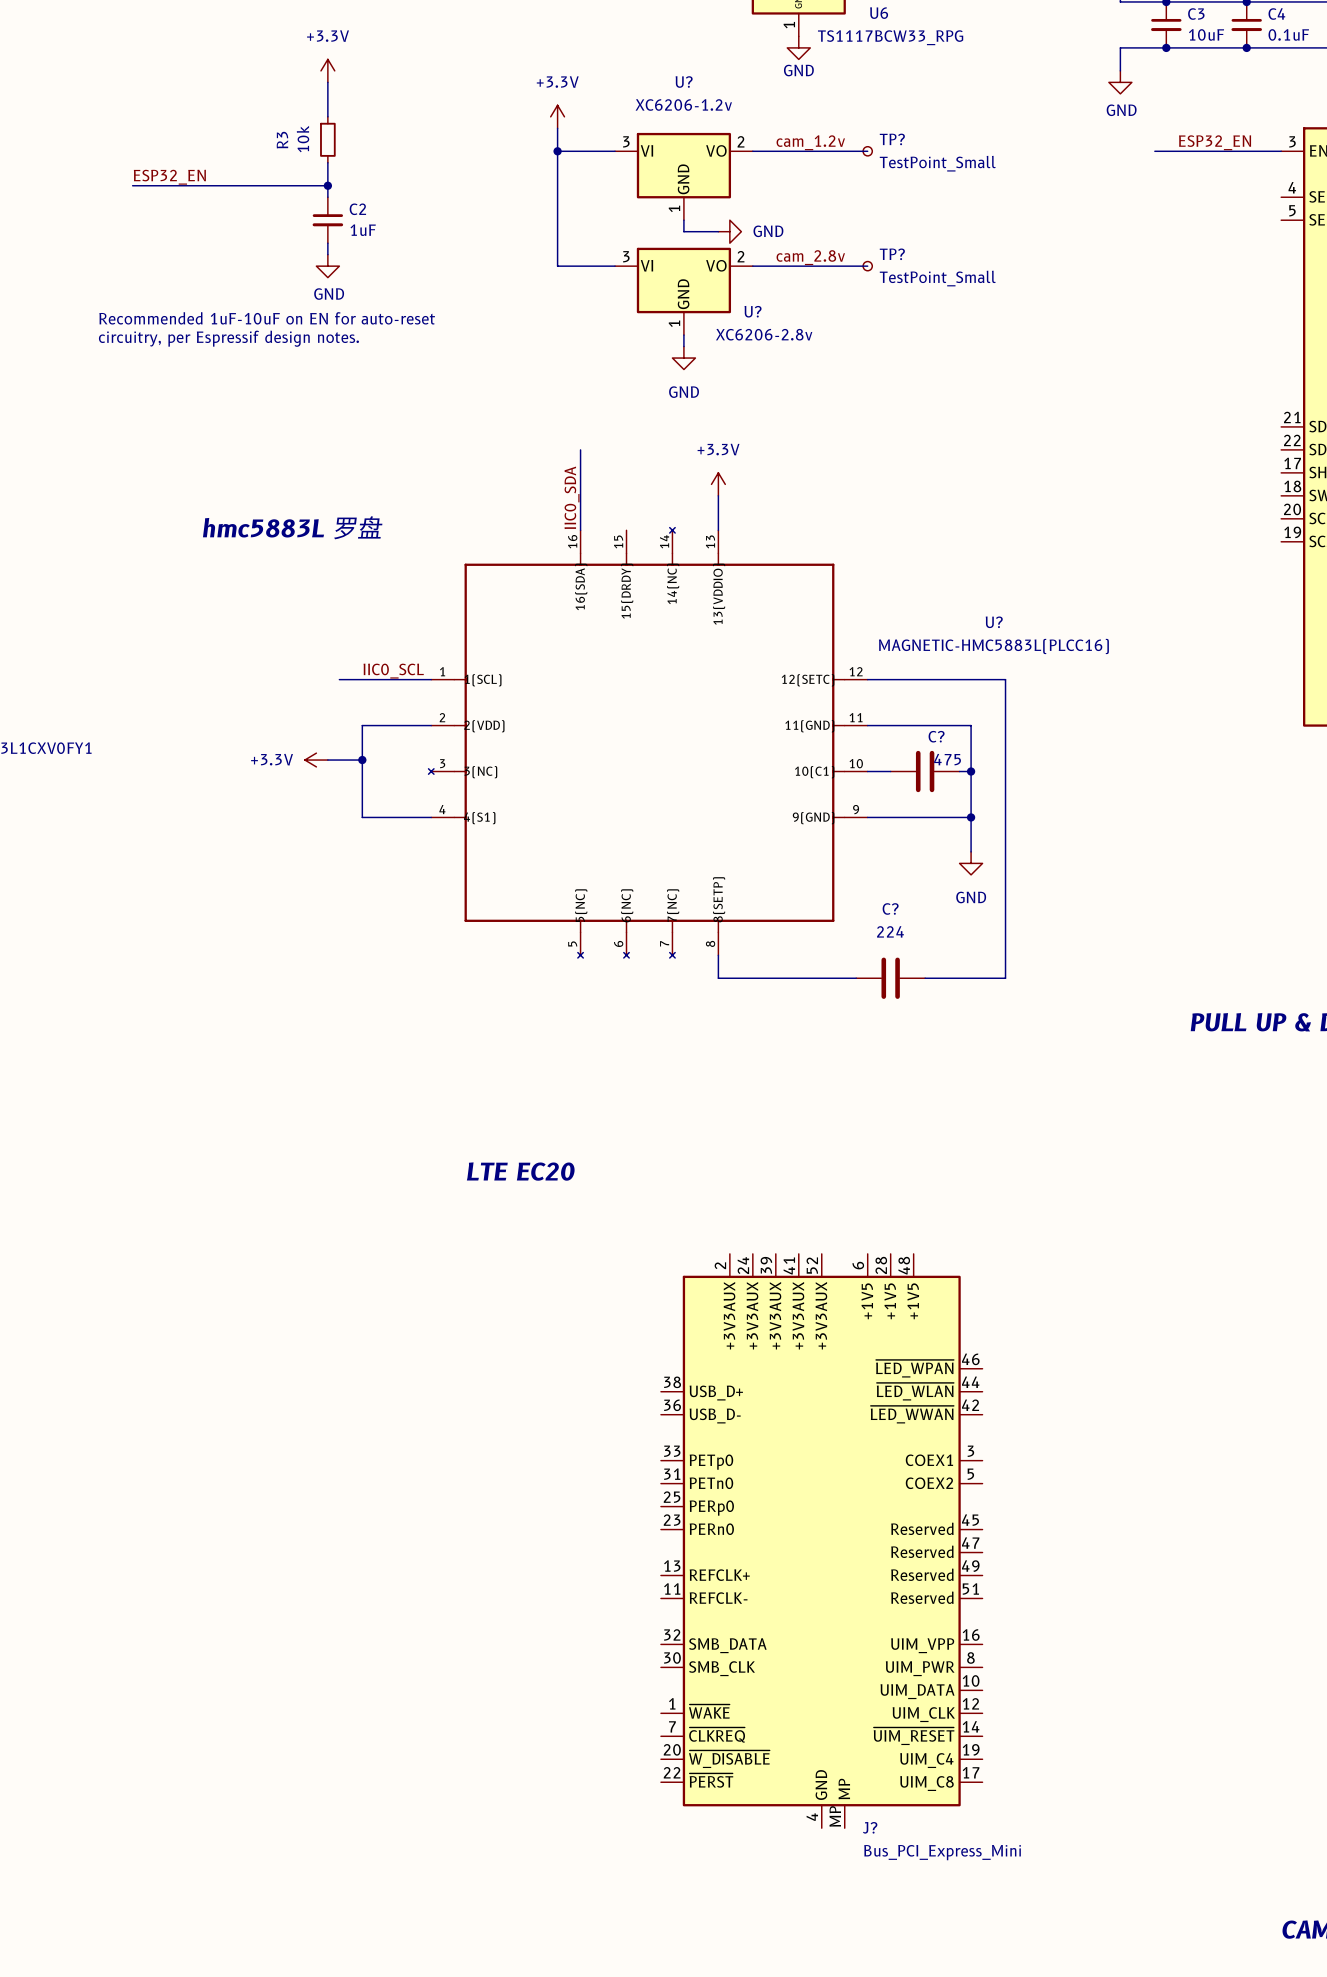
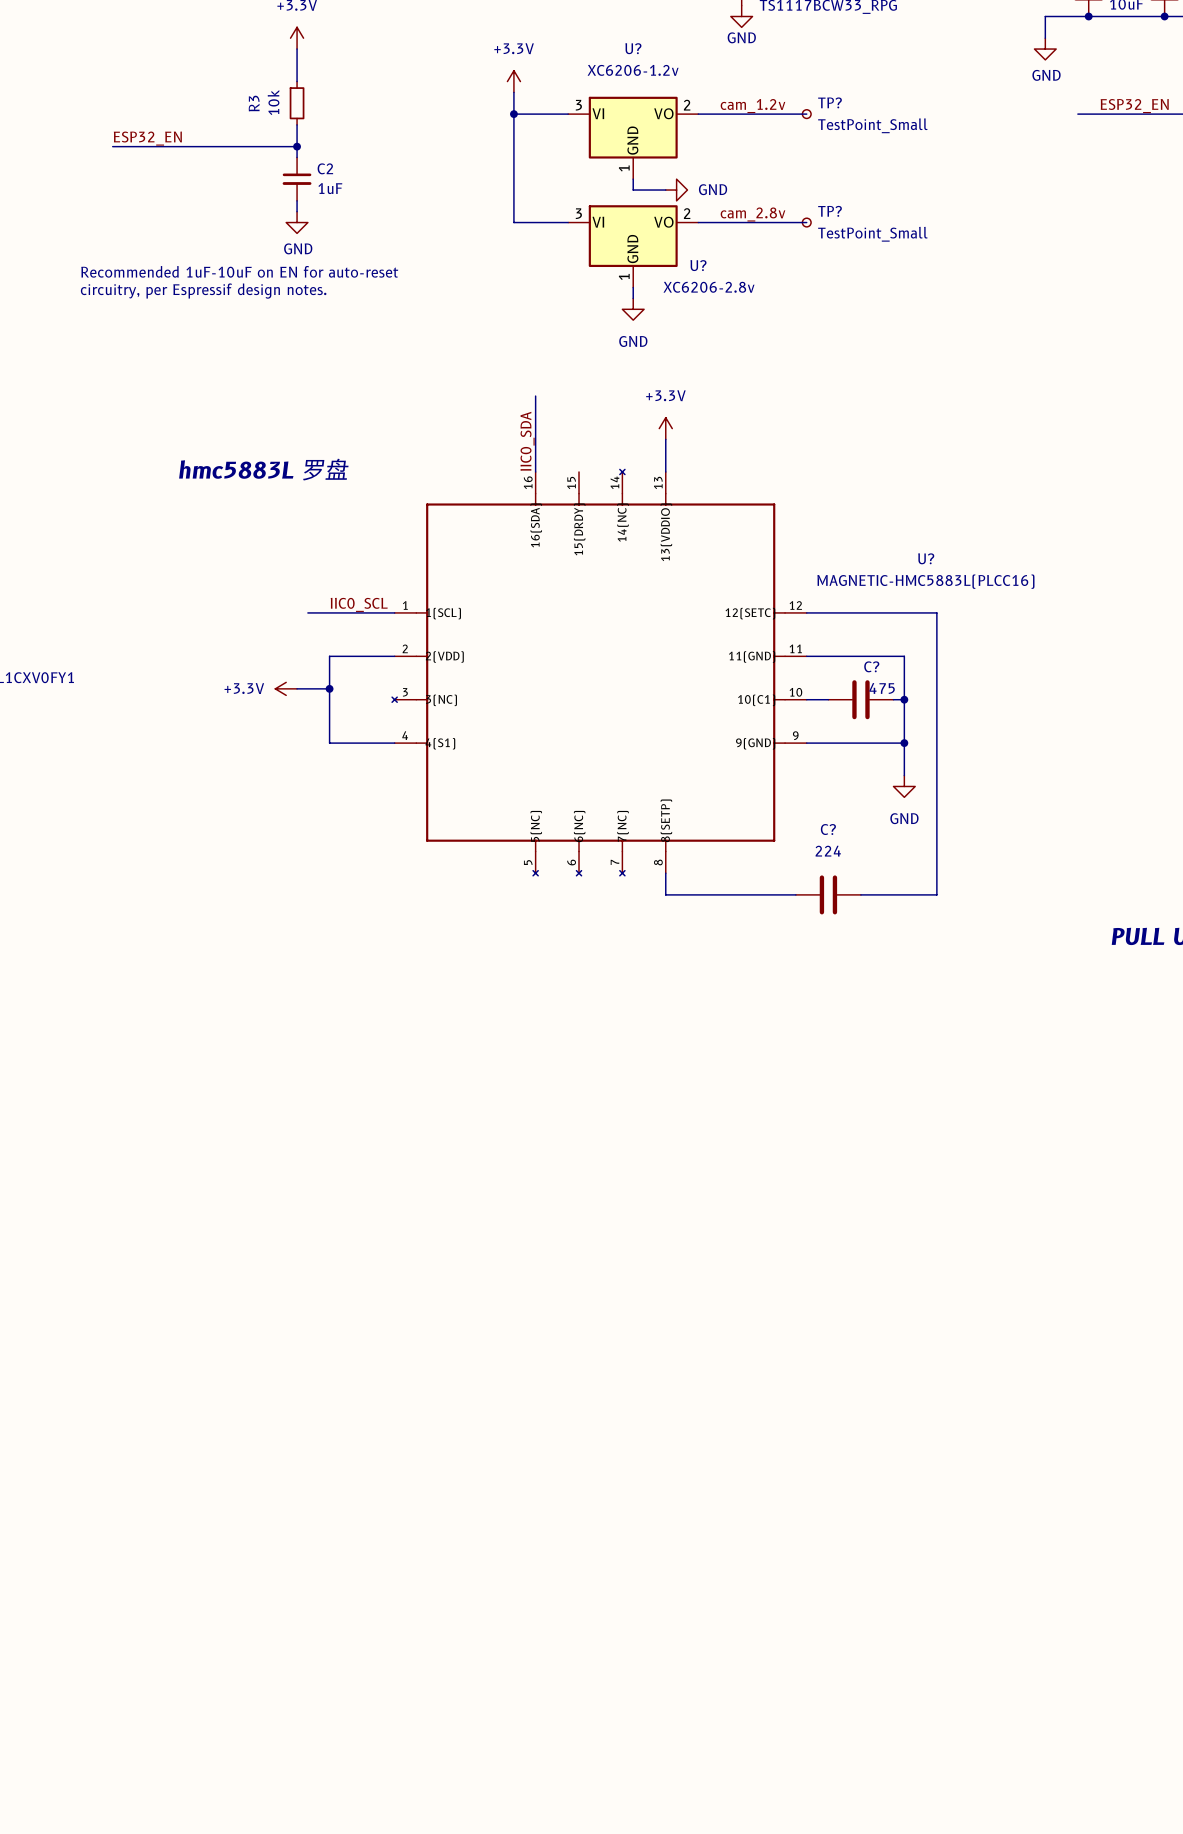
text: LTE EC20 (520, 1171) -> none
J?: Bus_PCI_Express_Mini (821, 1541) -> none

